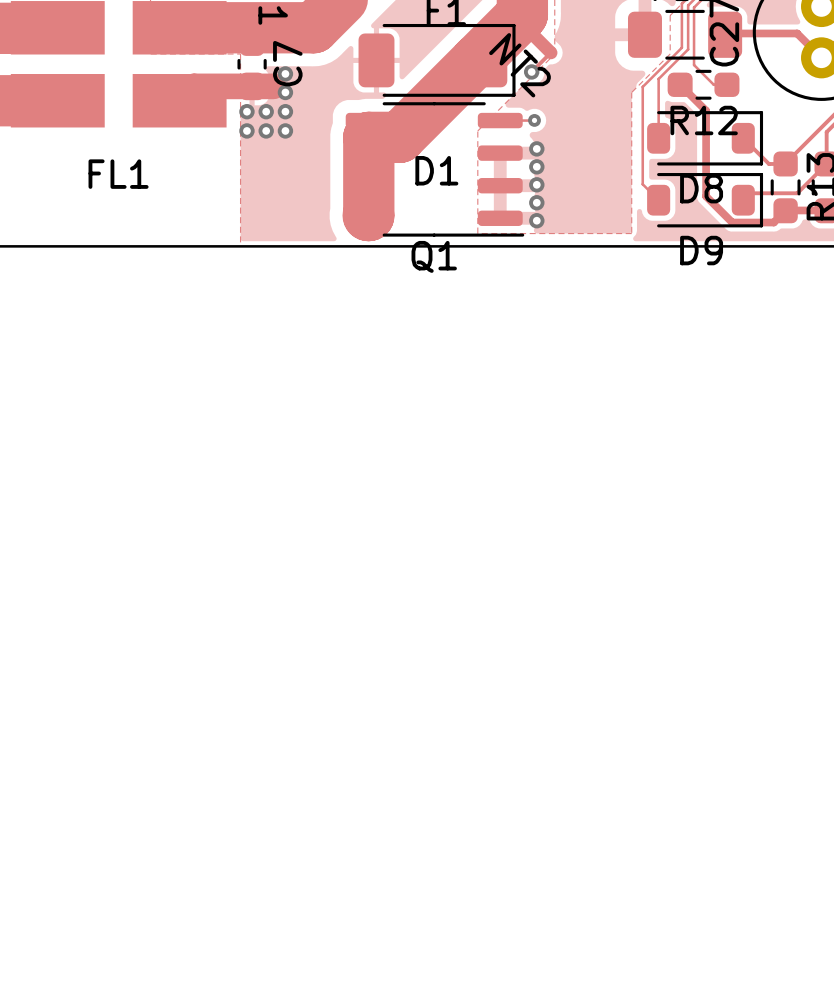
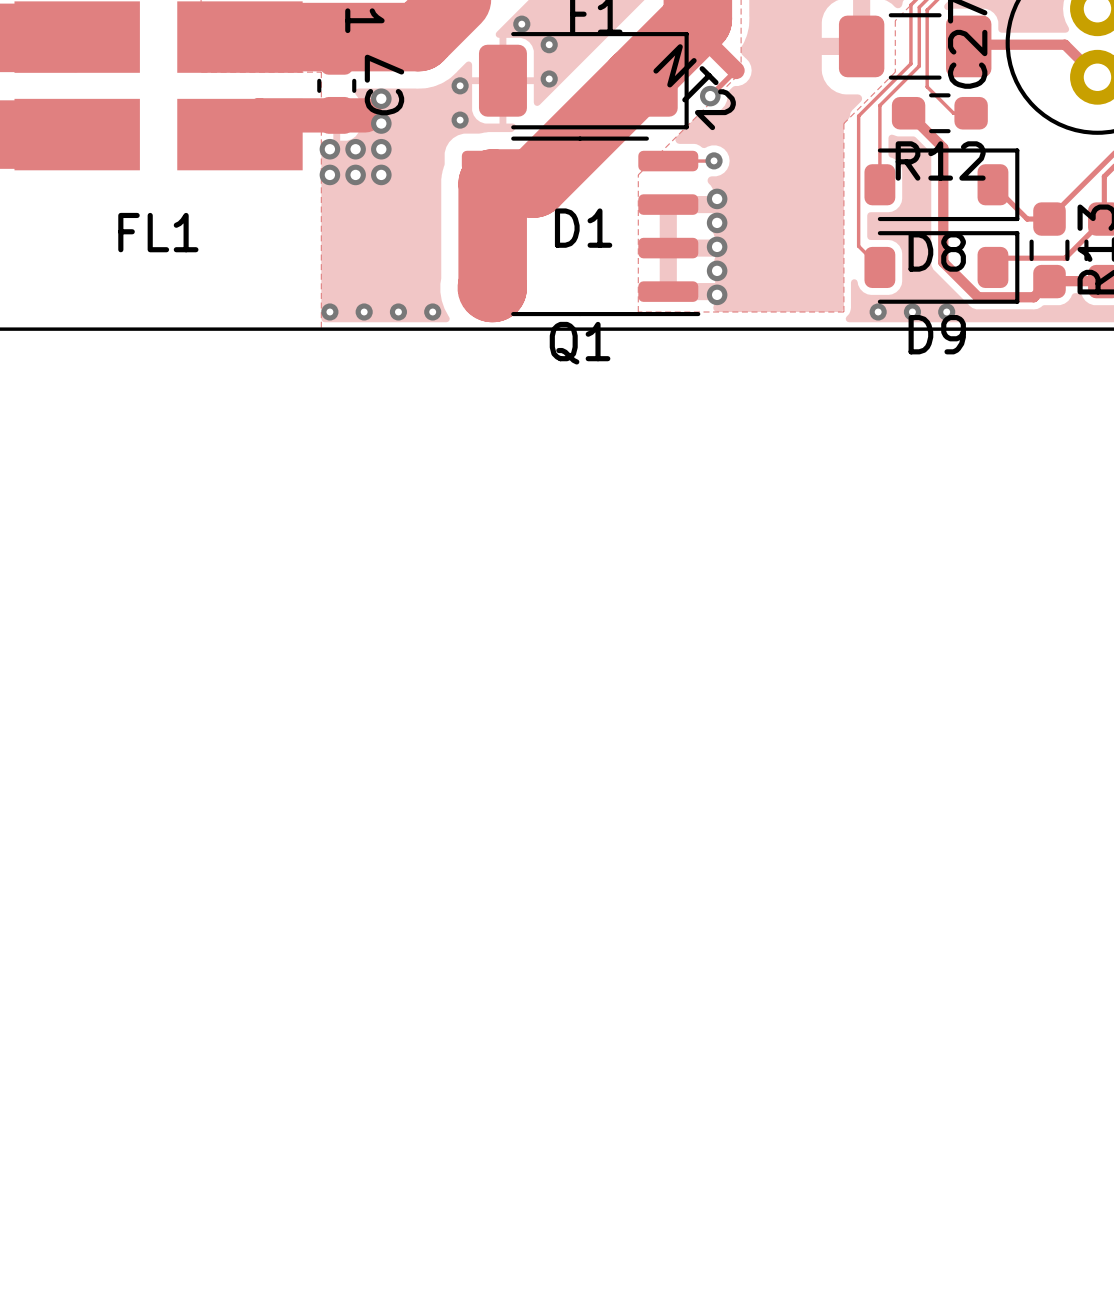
via: none -> (521, 24)
via: none -> (549, 44)
via: none -> (549, 78)
via: none -> (460, 85)
via: none -> (460, 120)
via: none -> (329, 311)
via: none -> (364, 311)
via: none -> (398, 311)
via: none -> (432, 311)
via: none -> (878, 311)
via: none -> (912, 311)
via: none -> (946, 311)

